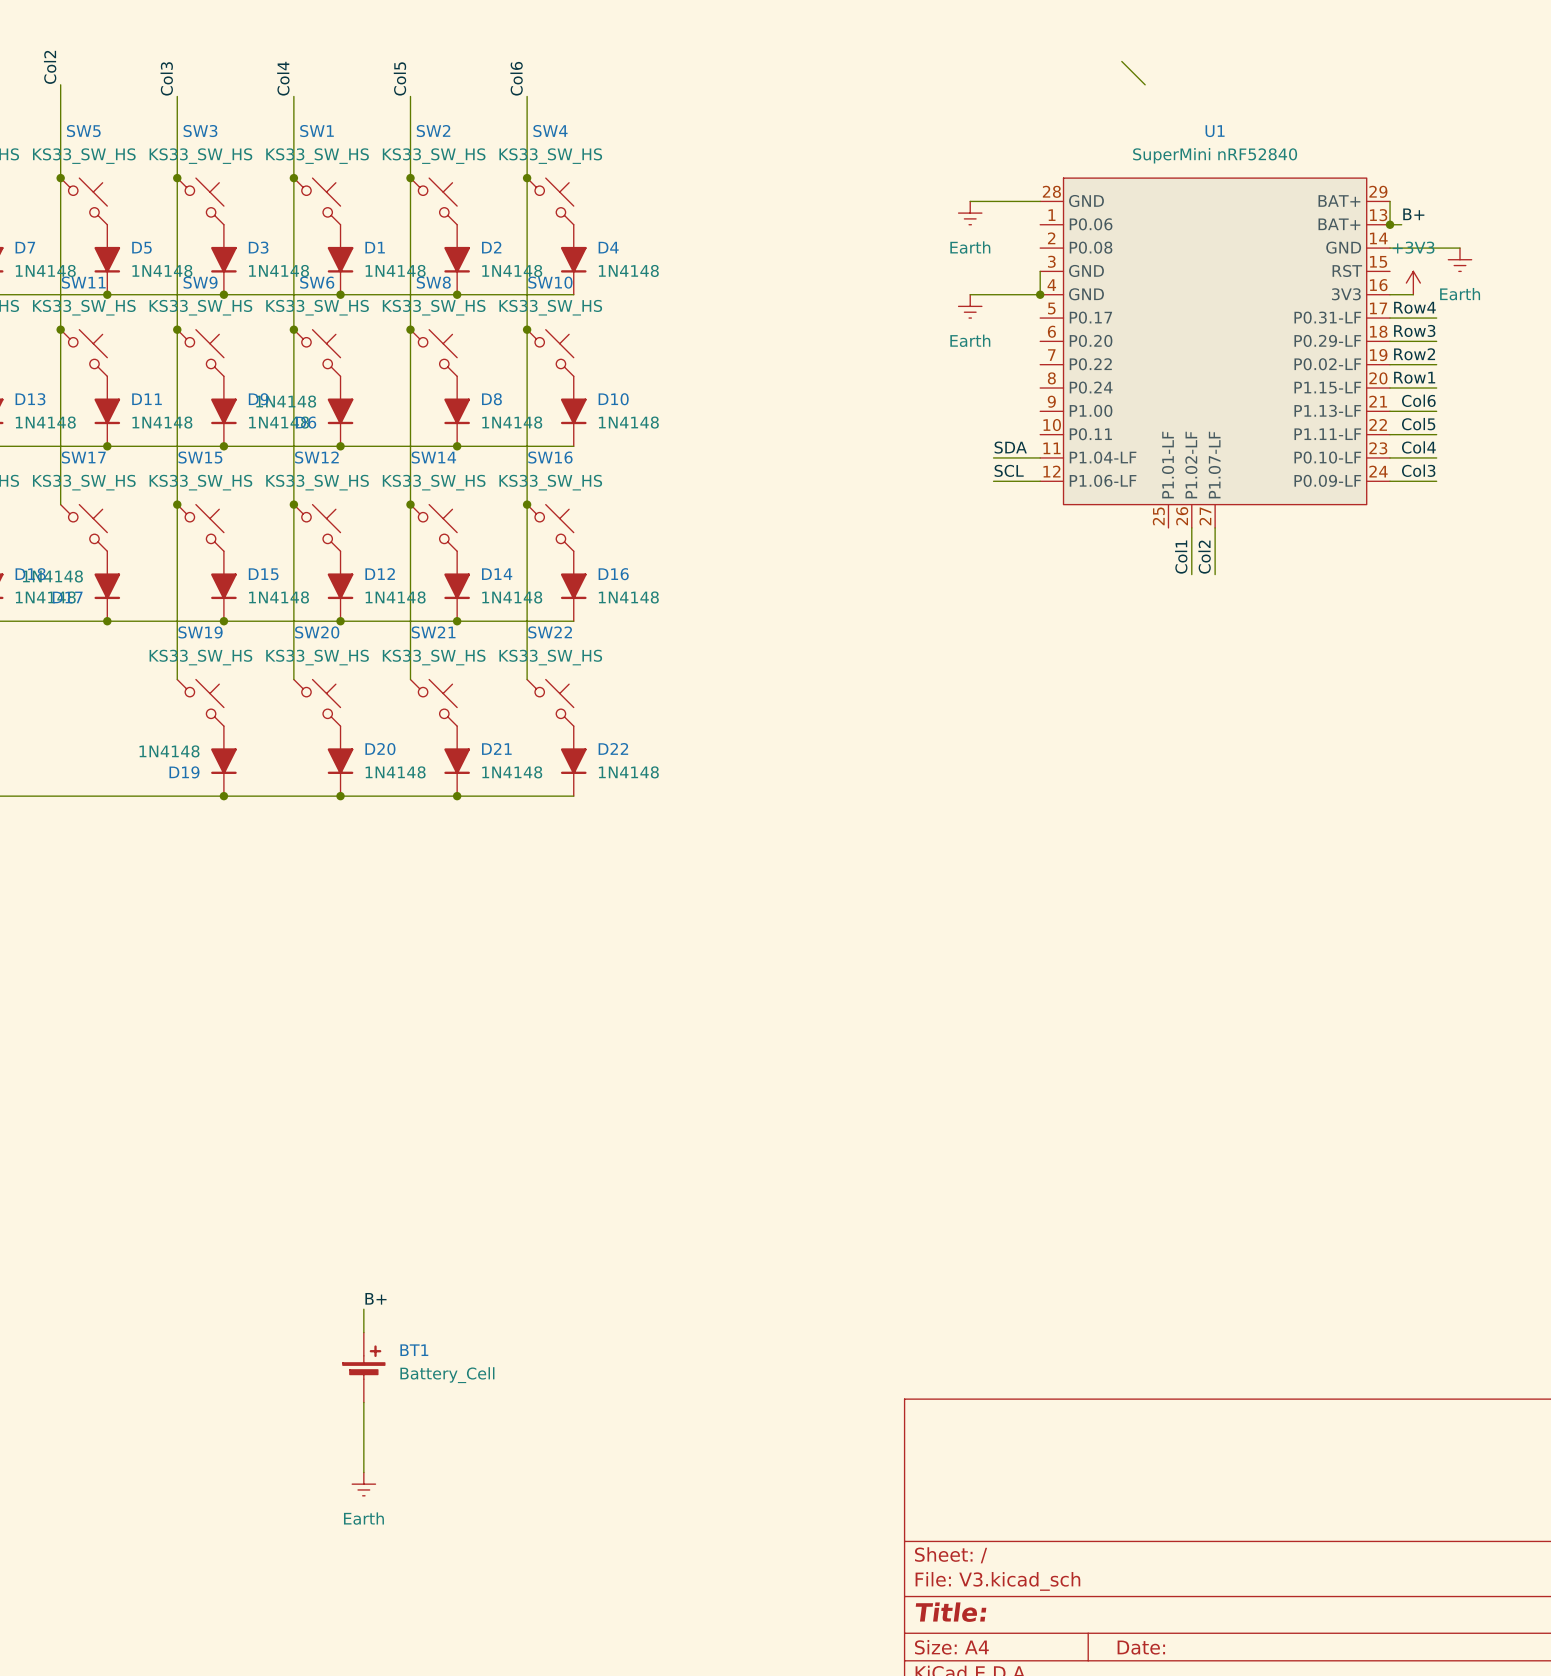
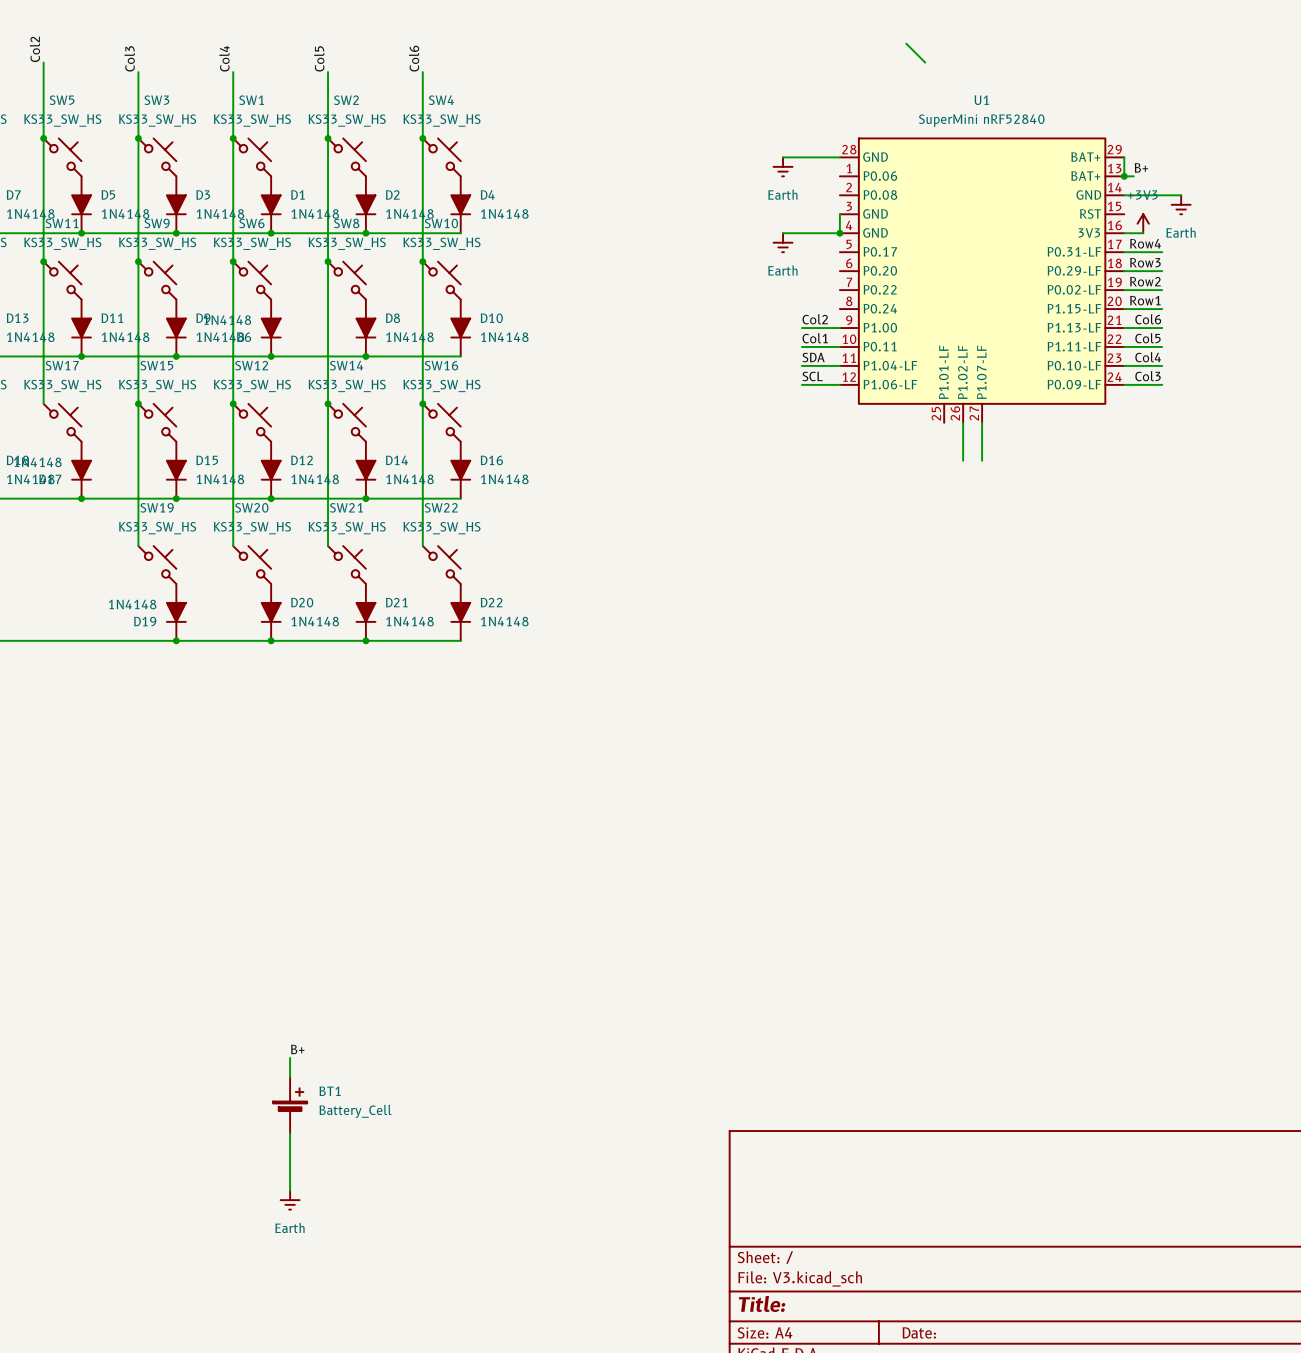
label: none -> Col2 (815, 319)
wire: none -> (801, 328) (839, 328)
label: none -> Col1 (815, 338)
wire: none -> (801, 346) (839, 346)
label: Col1 (1181, 557) -> none
label: Col2 (1204, 557) -> none

